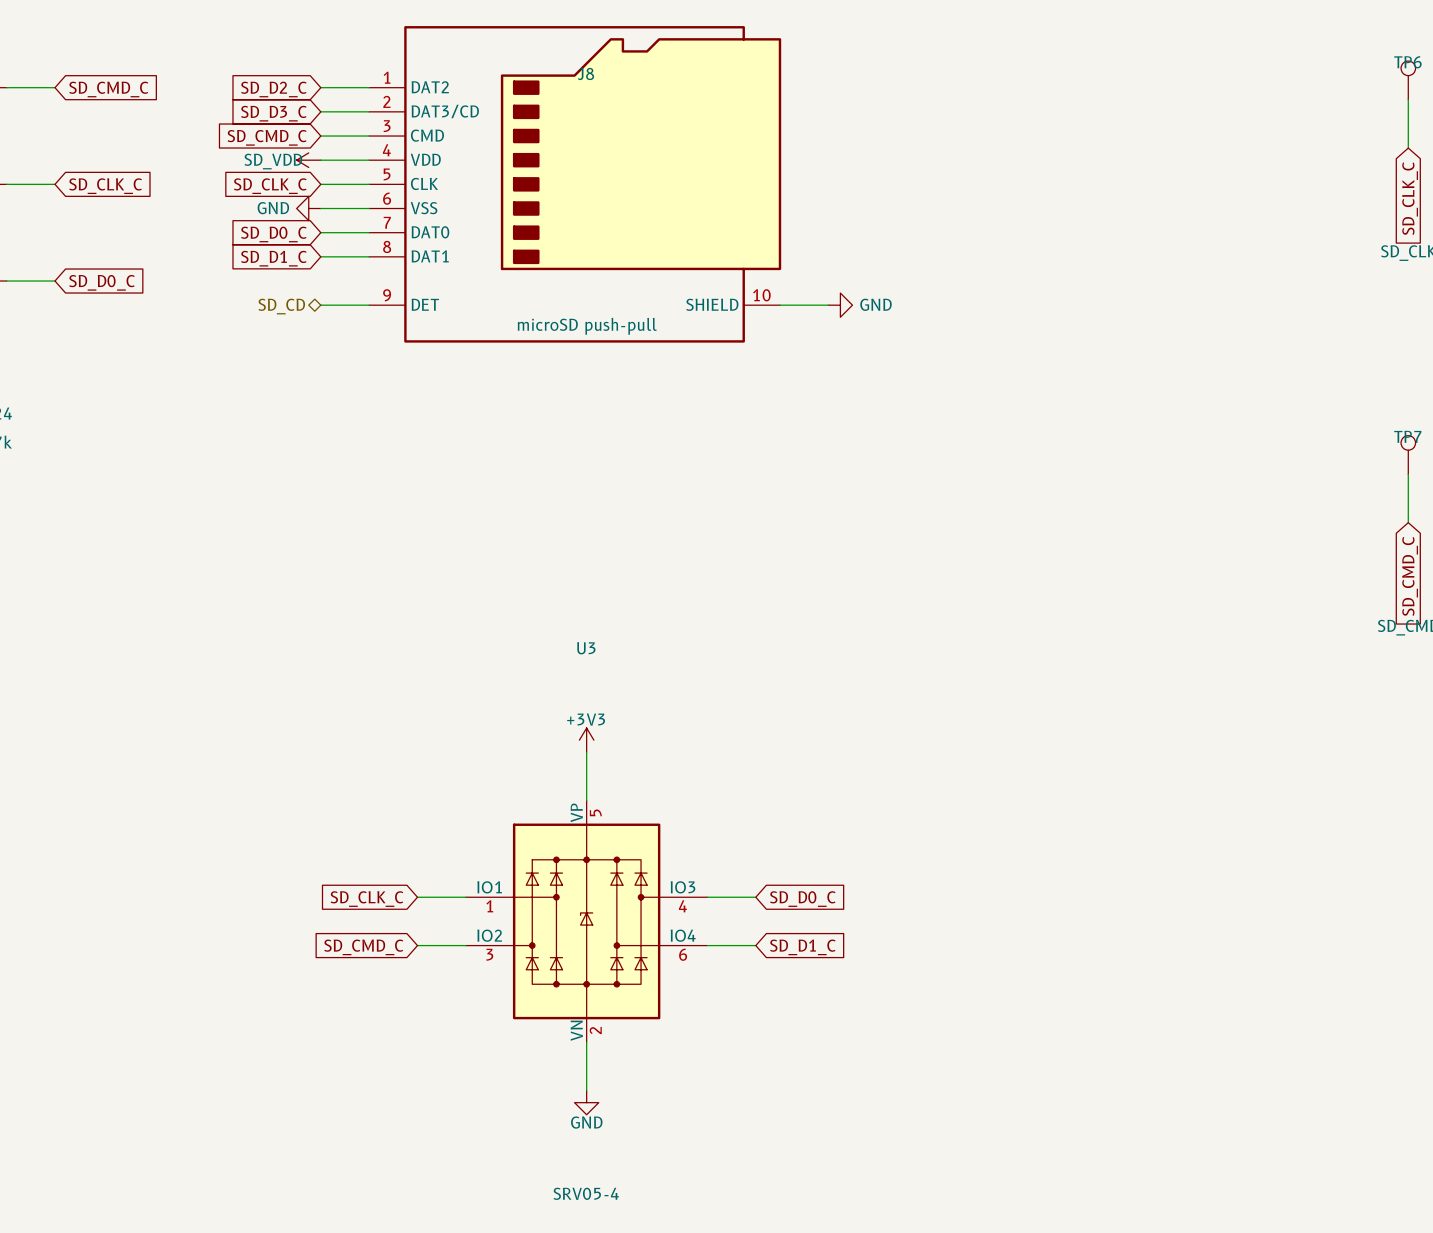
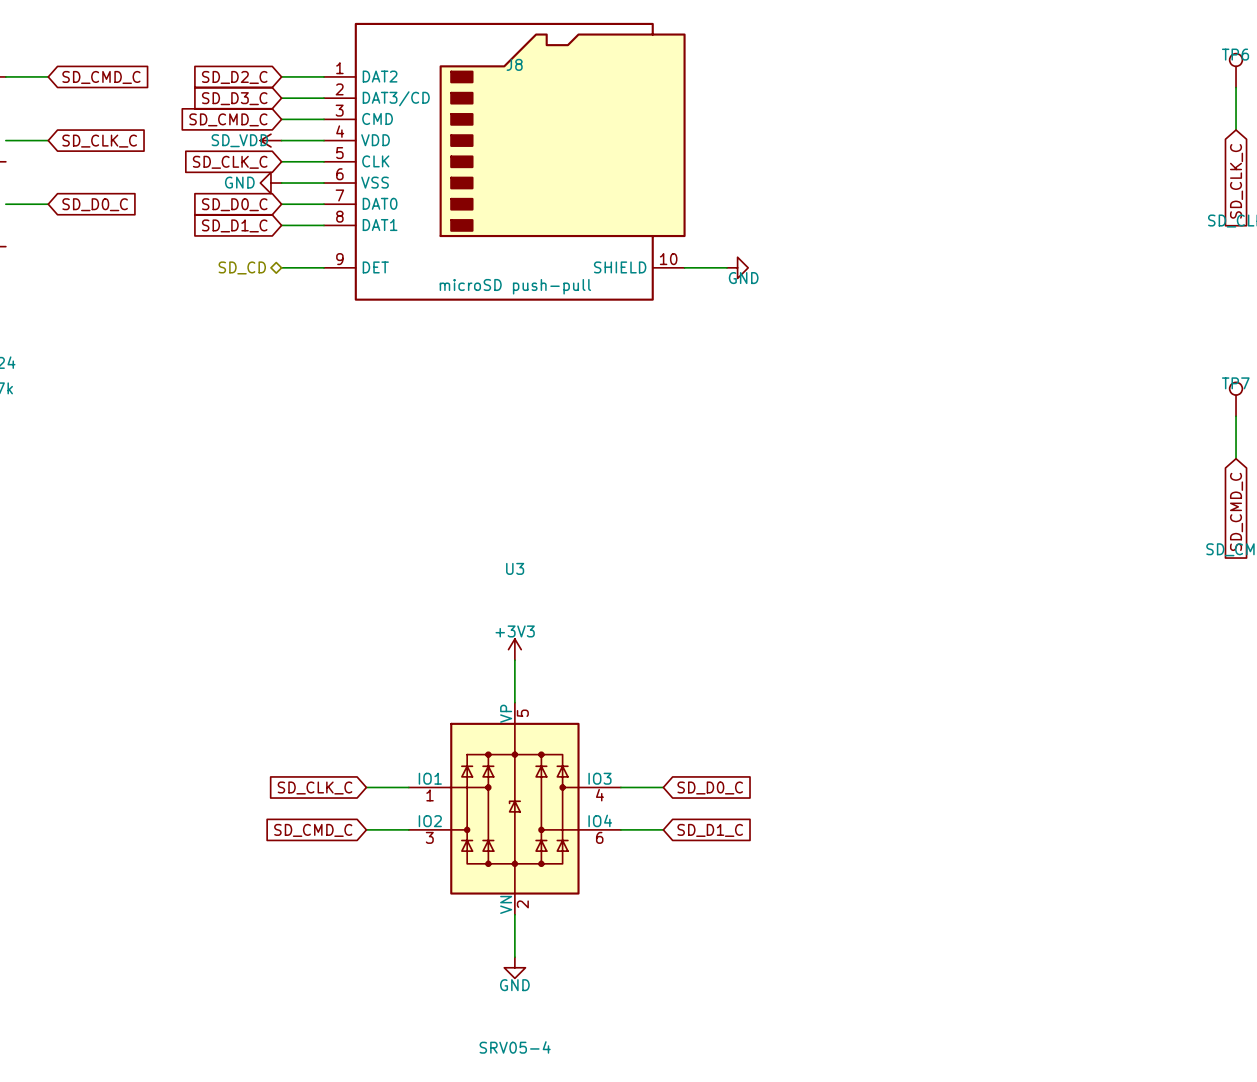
wire: (6, 184) (54, 184) -> (5, 140) (48, 140)
global label position: SD_CLK_C (105, 186) -> SD_CLK_C (99, 141)
wire: (6, 281) (54, 281) -> (5, 204) (48, 204)
global label position: SD_D0_C (101, 282) -> SD_D0_C (95, 204)
power symbol text position: GND (875, 304) -> GND (743, 278)

